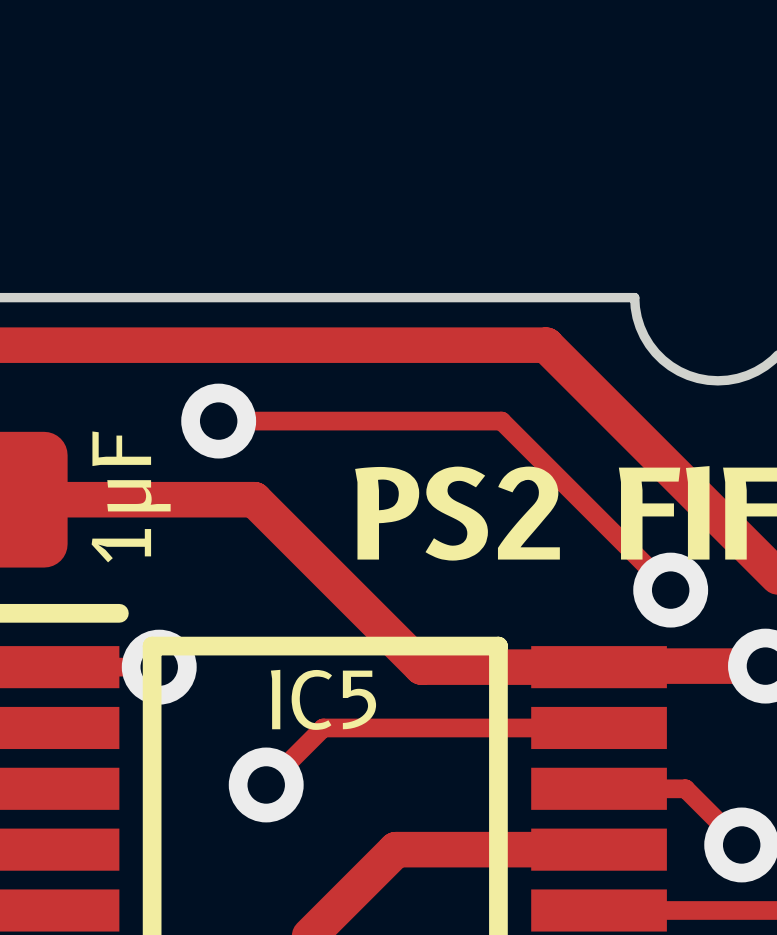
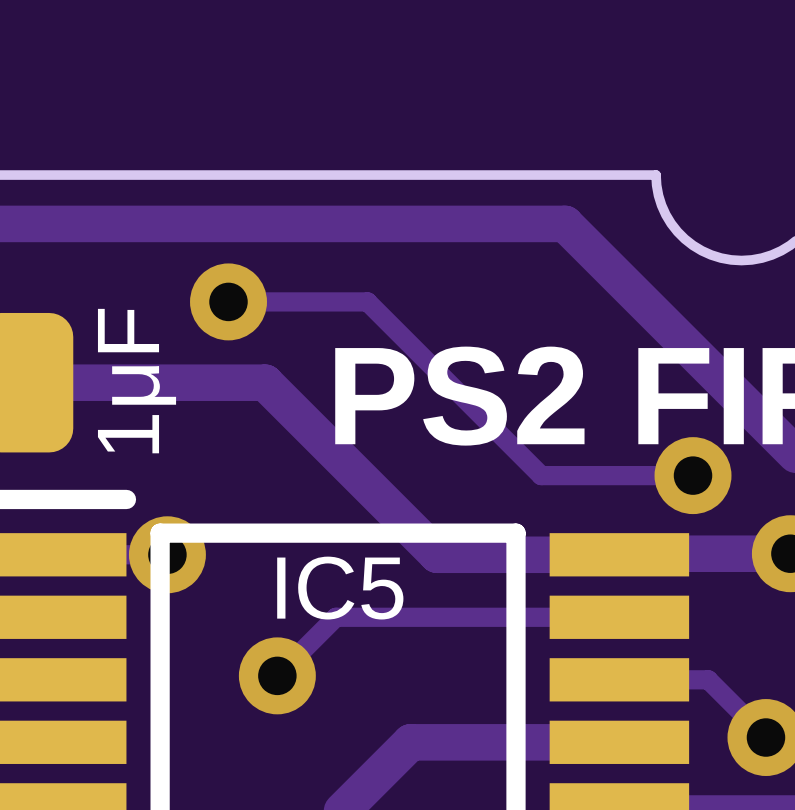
track: (354, 421) (501, 421) (670, 590) -> (367, 301) (541, 475) (693, 475)

